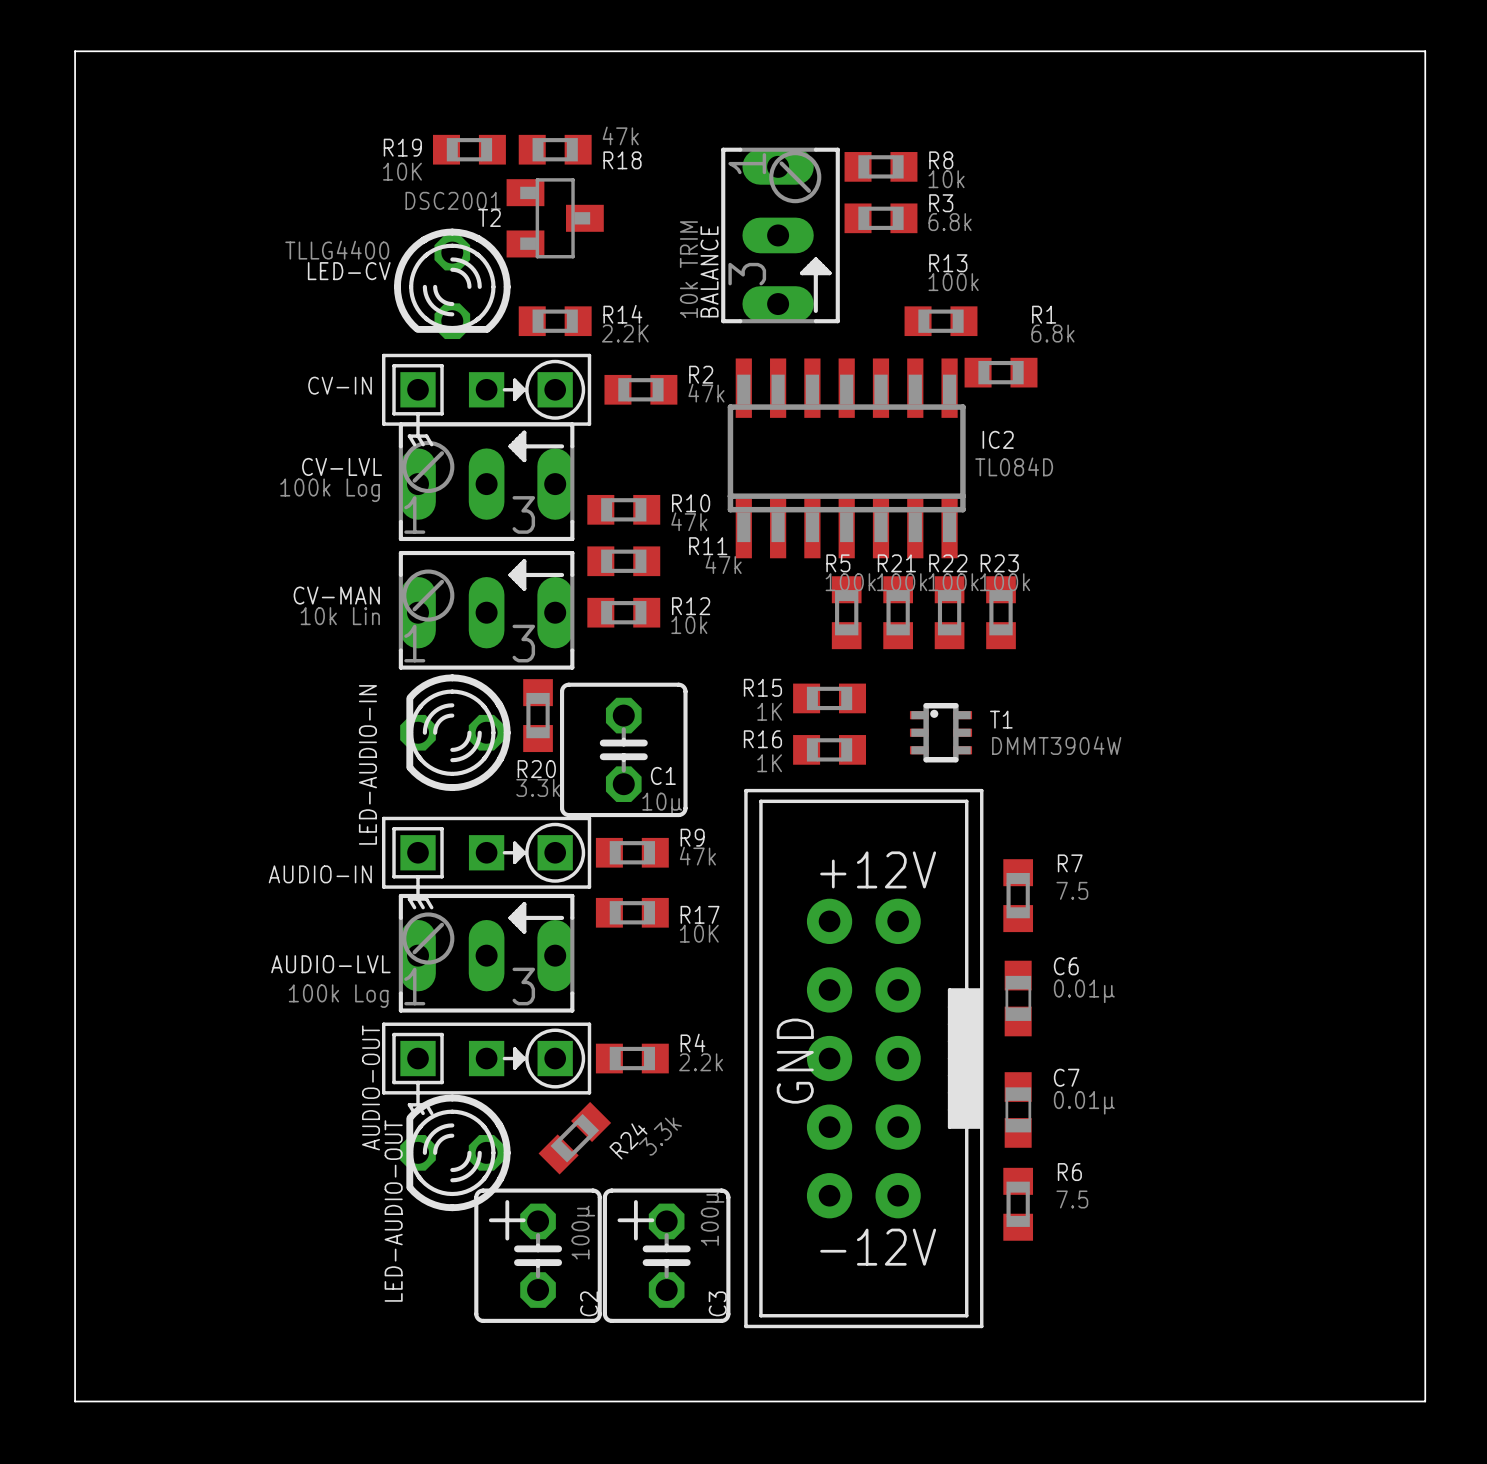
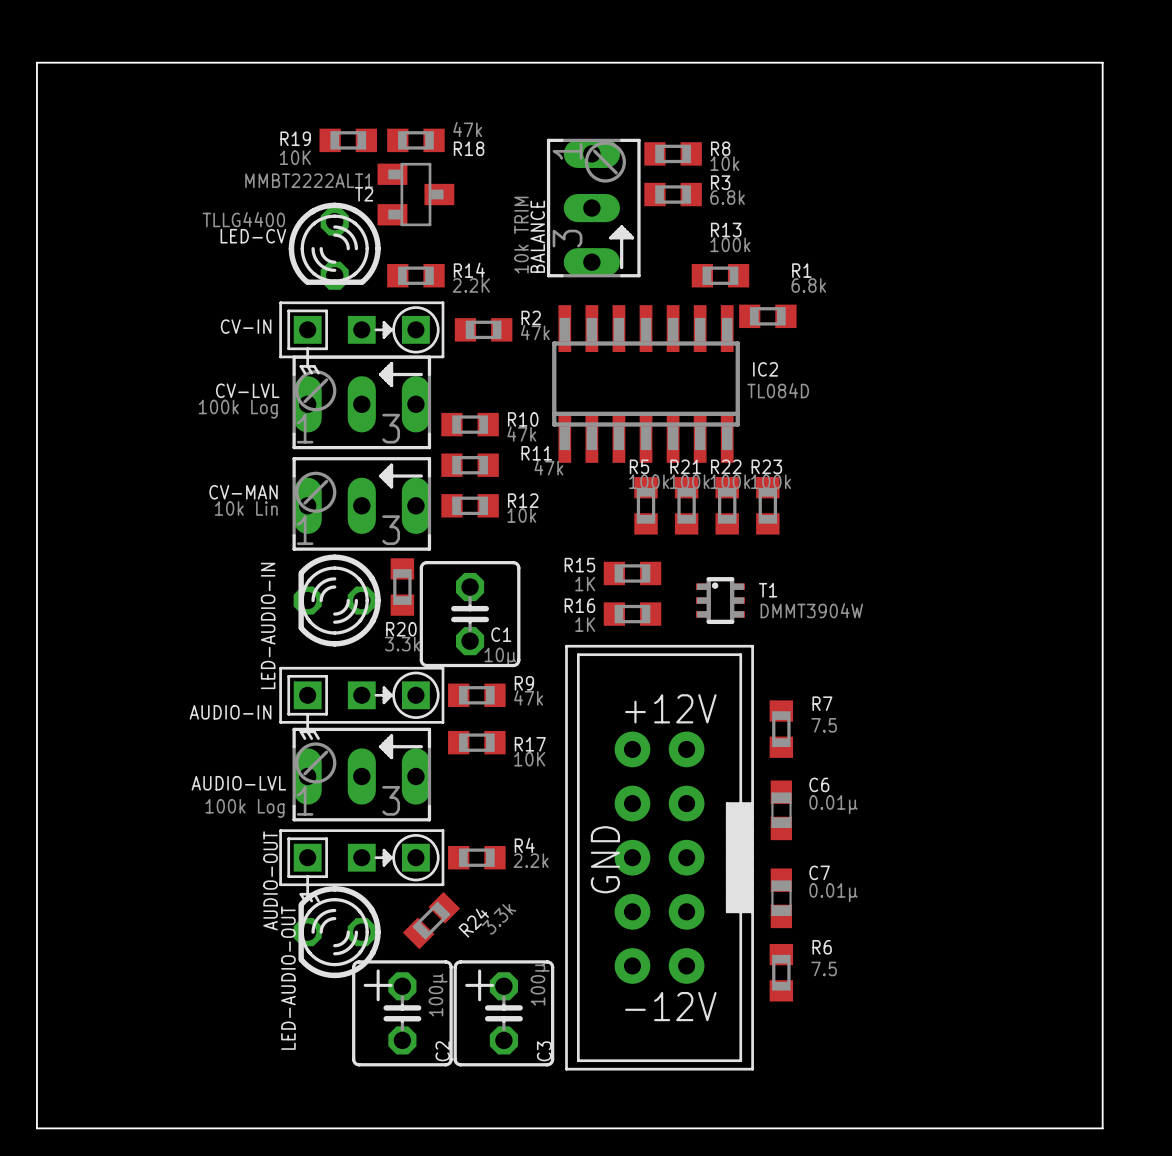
T2 value: DSC2001 (453, 200) -> MMBT2222ALT1 (309, 180)

